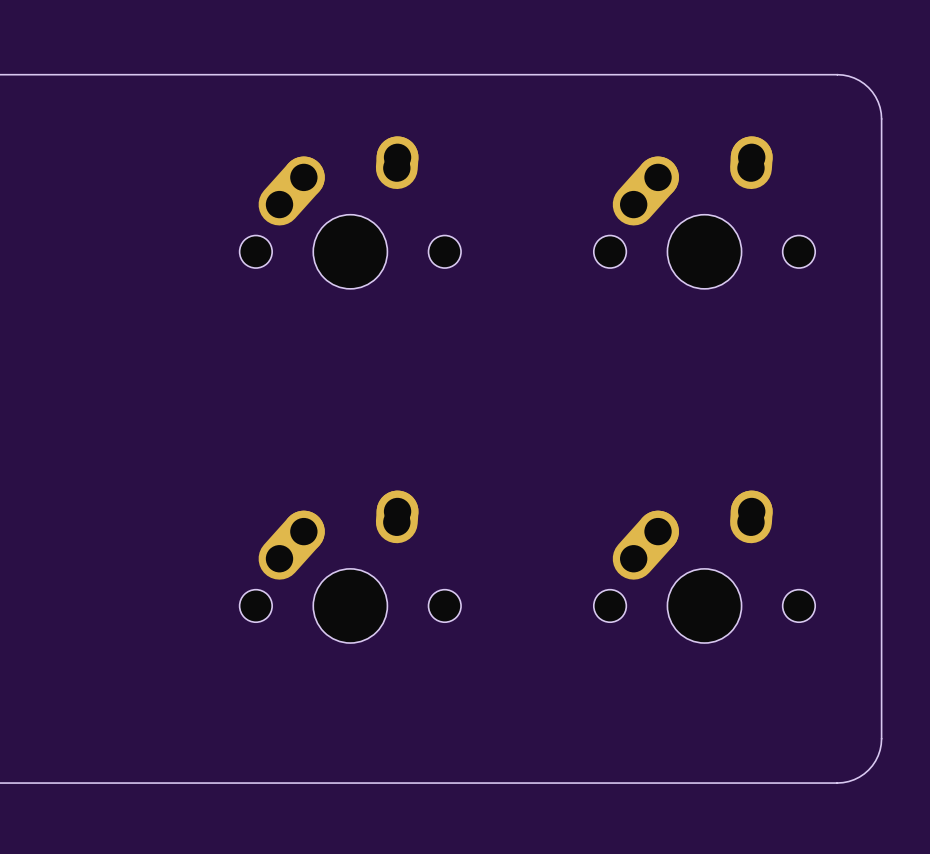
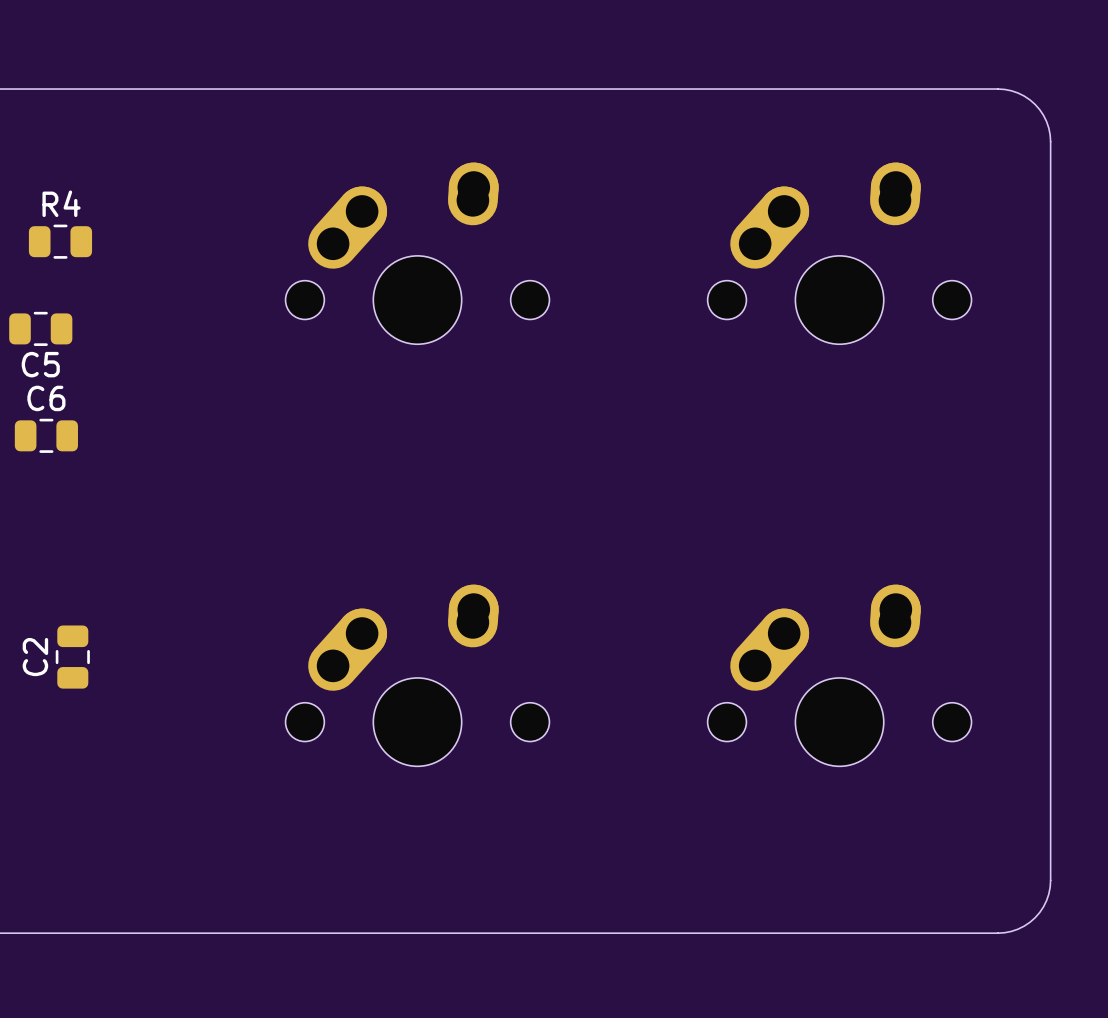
R4: none -> (60, 241)
C5: none -> (40, 328)
C6: none -> (46, 435)
C2: none -> (72, 657)

